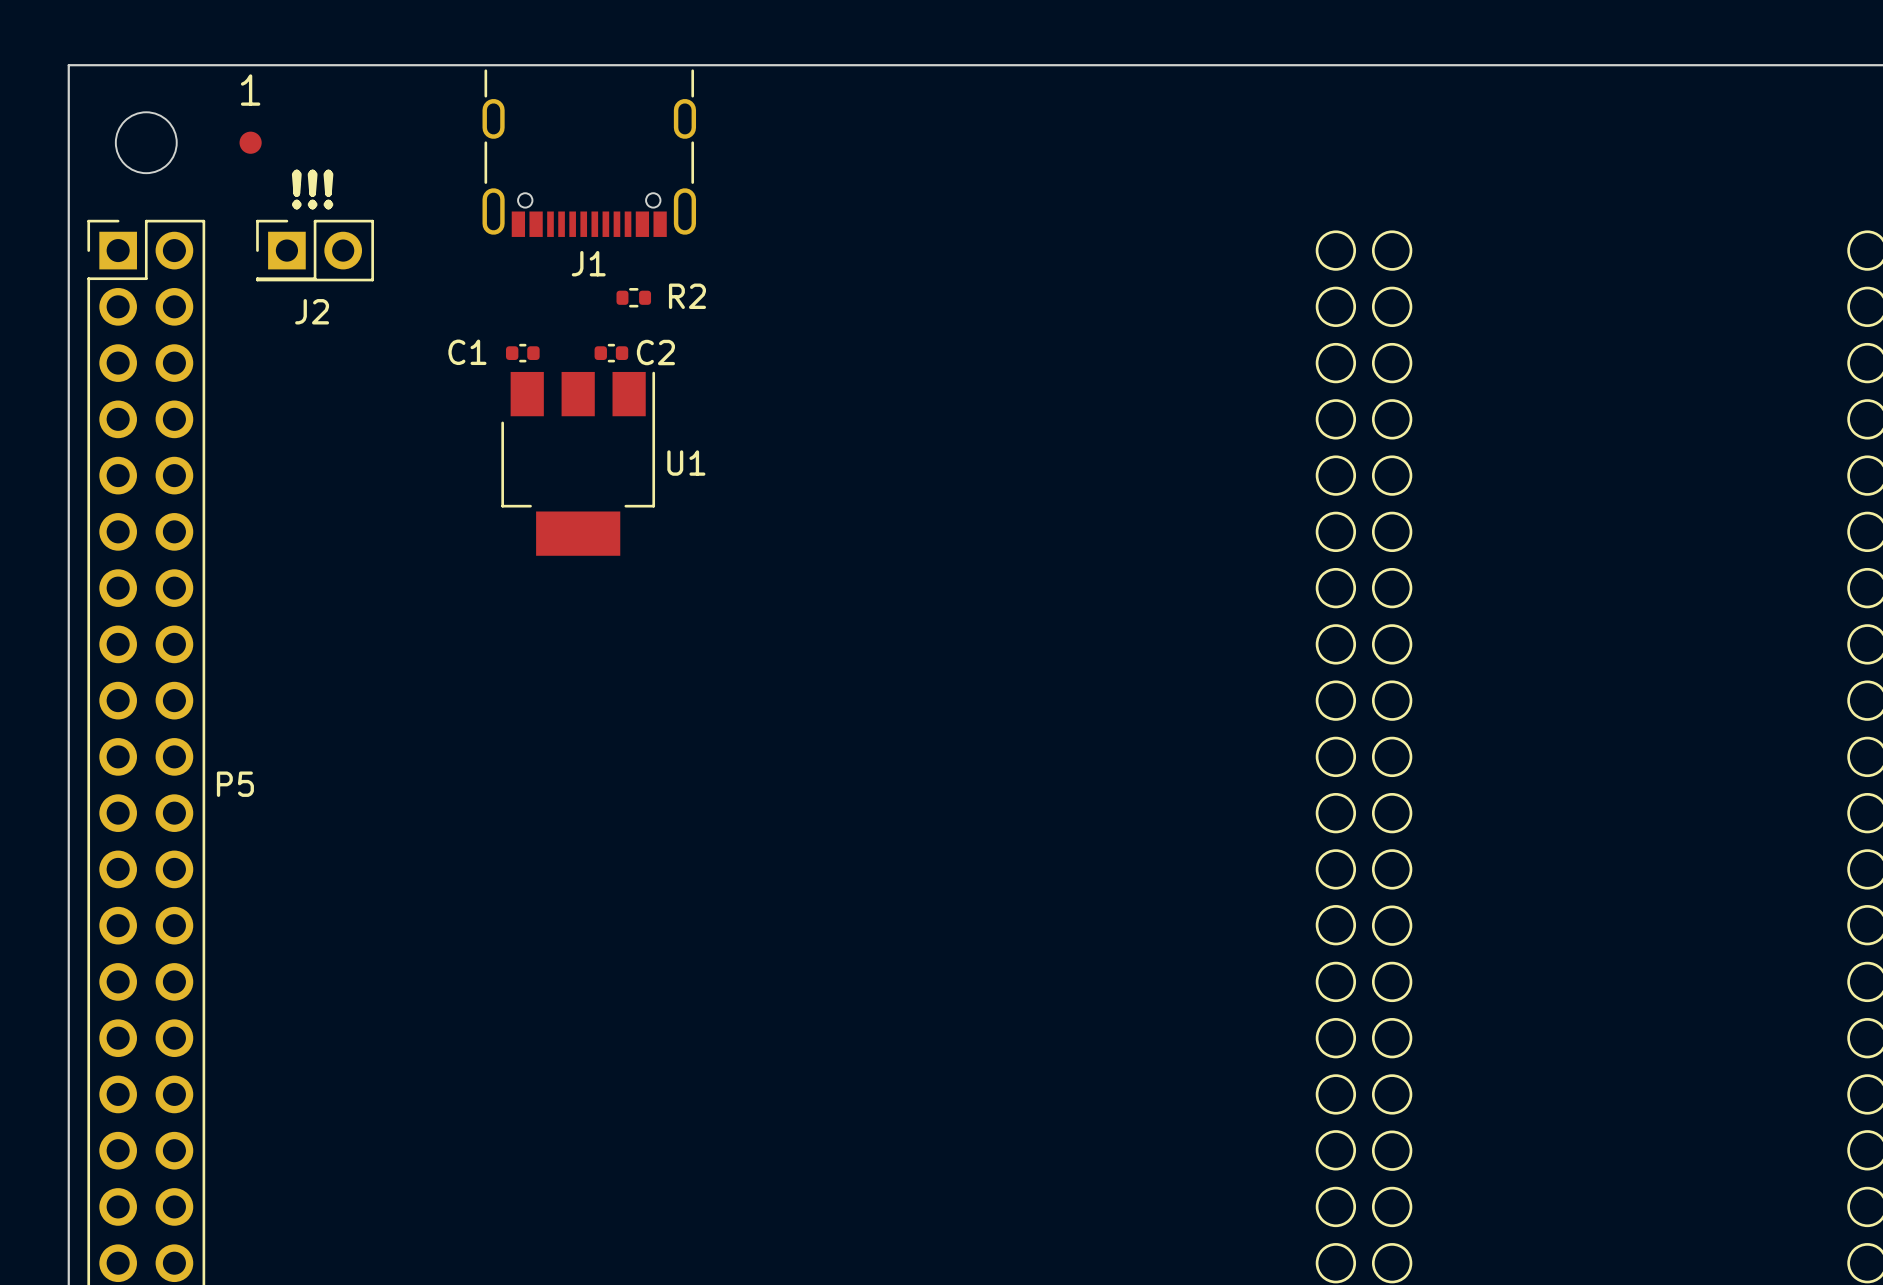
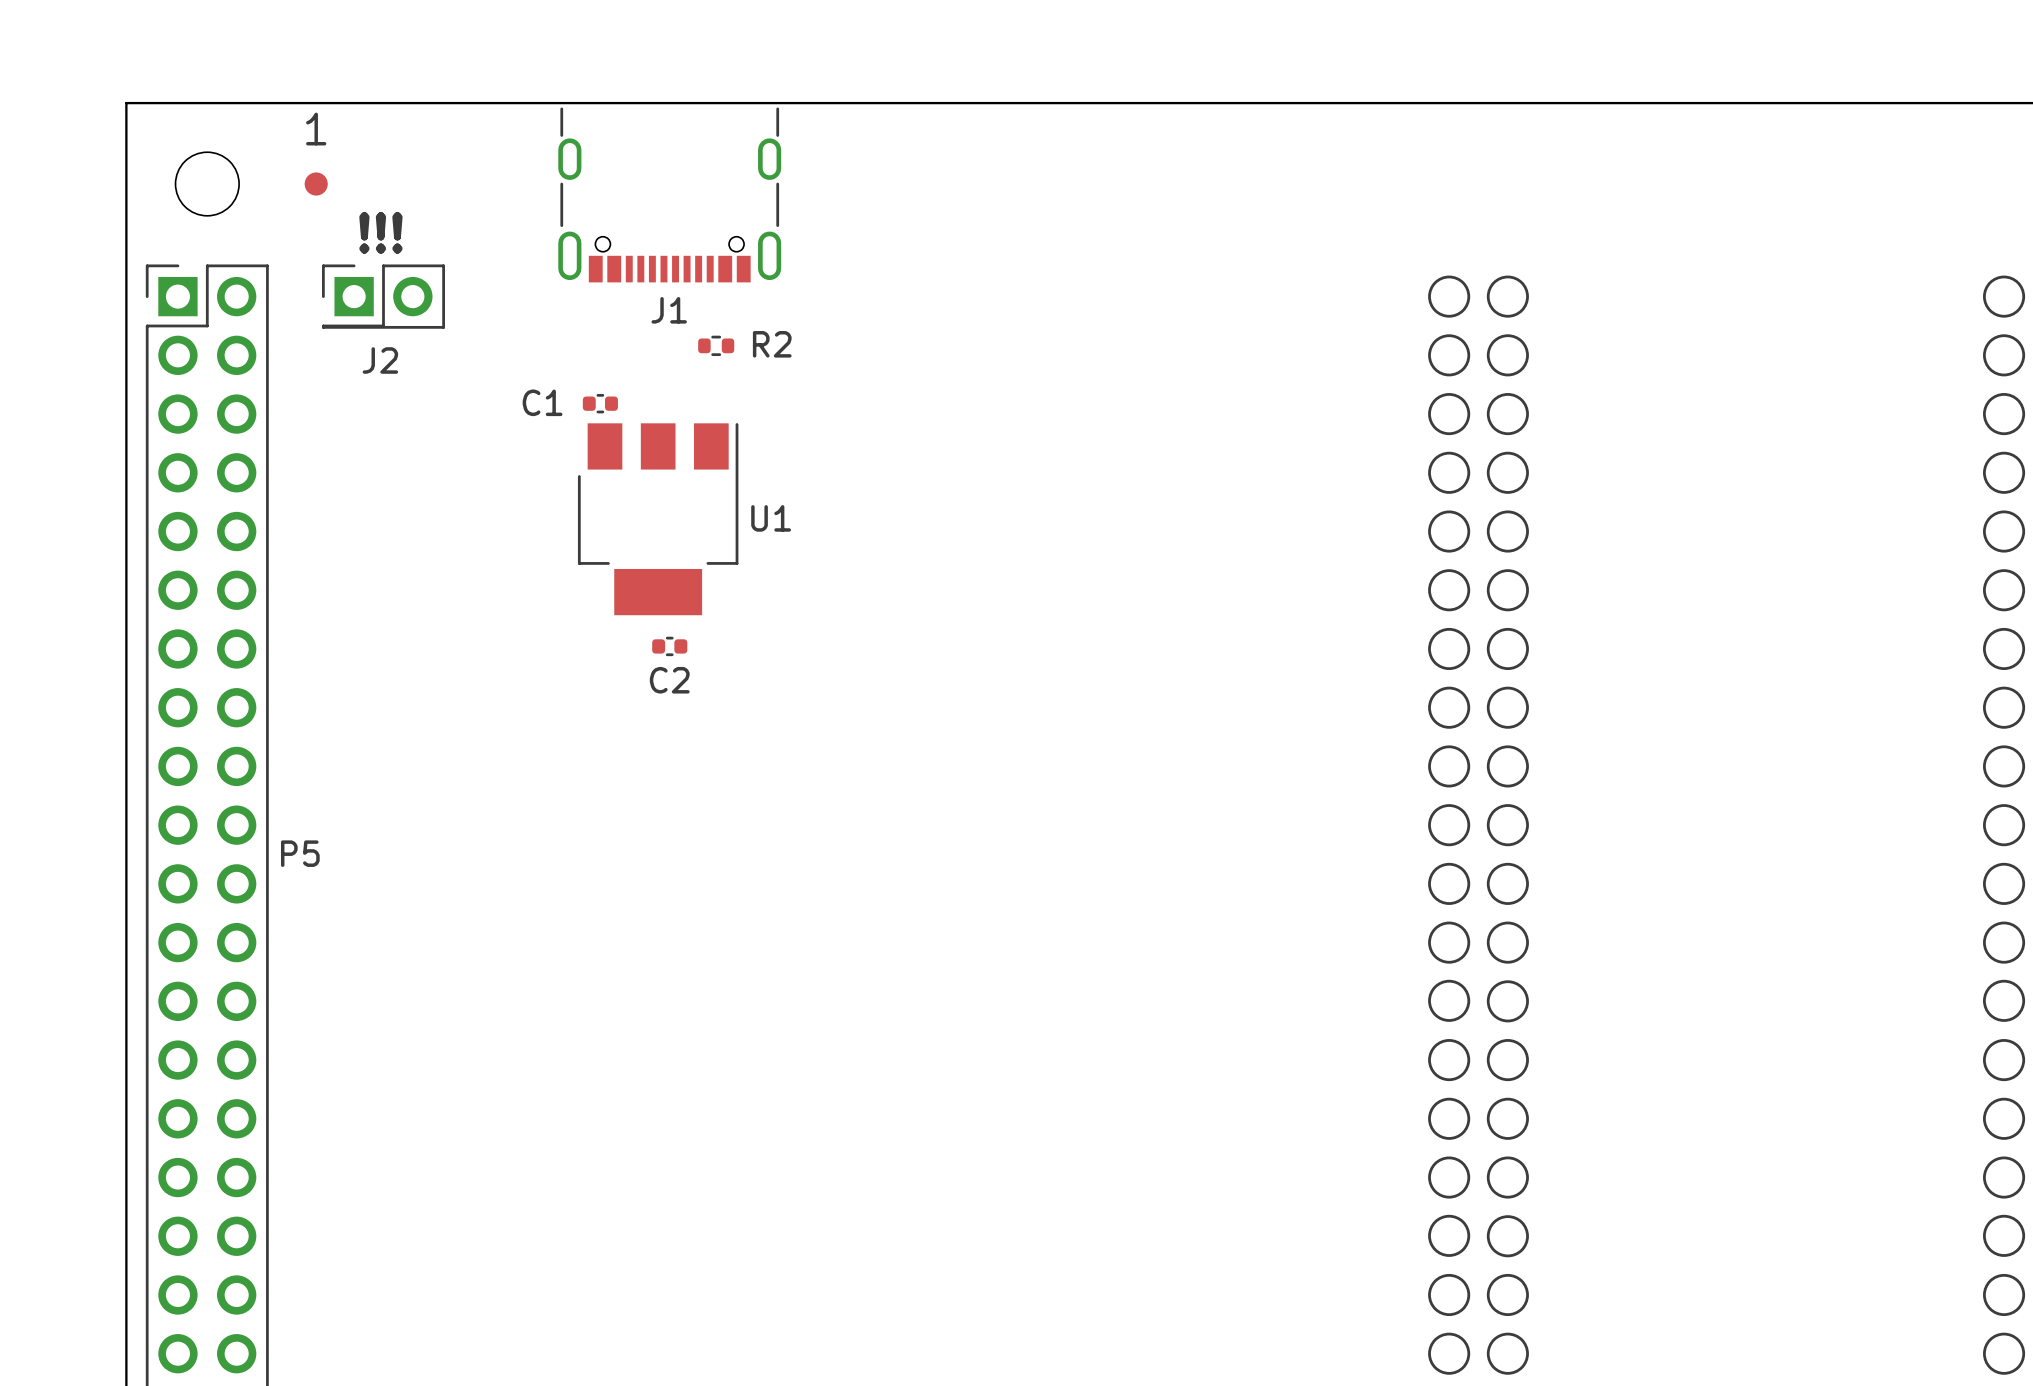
C2 name position: C2 (655, 352) -> C2 (669, 680)
C2 position: (611, 353) -> (669, 646)

